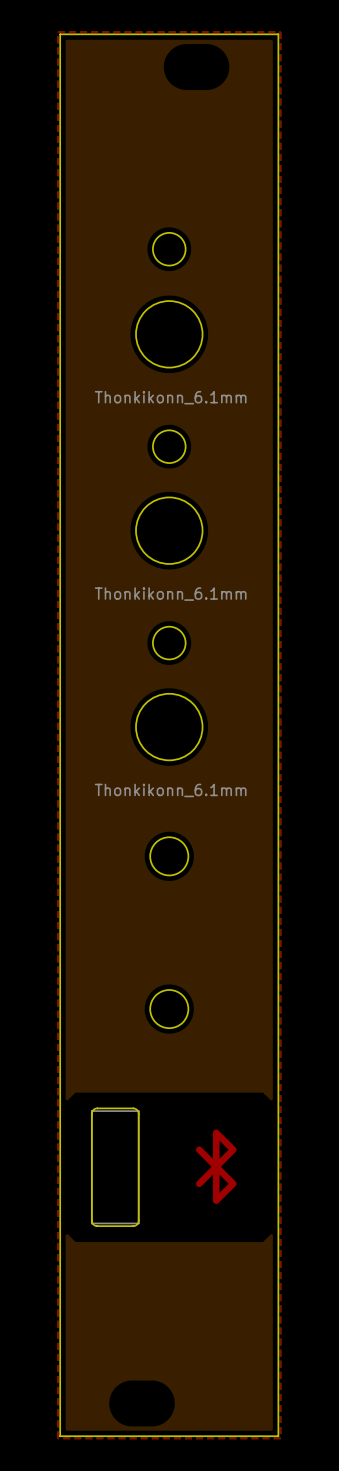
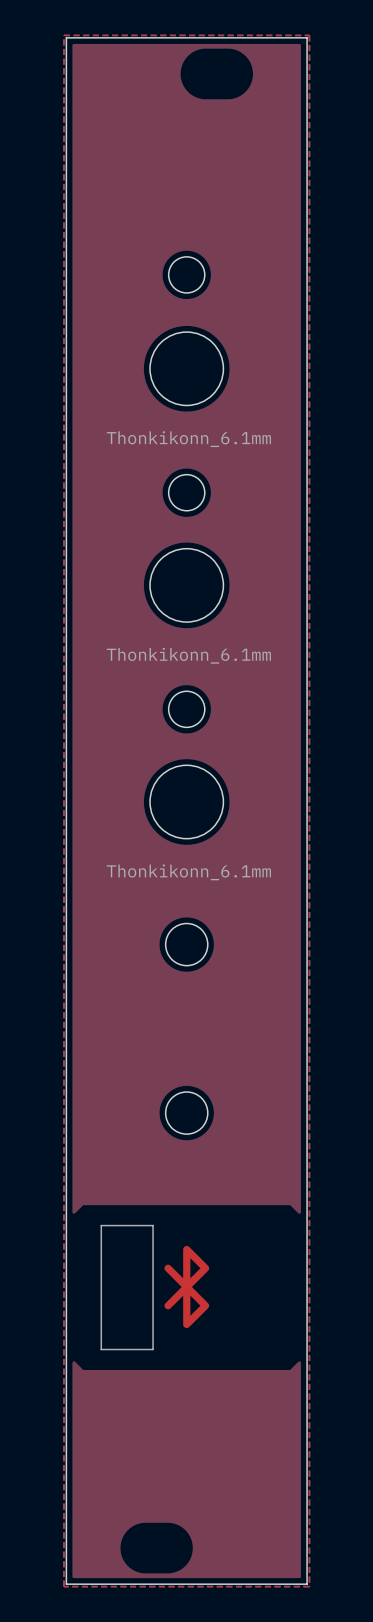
board edge: (97, 1108) (133, 1108) (138, 1112) (138, 1220) (134, 1225) (96, 1226) (92, 1222) (91, 1113) (93, 1110) (97, 1108) -> none
drawing position: (216, 1166) -> (186, 1287)

